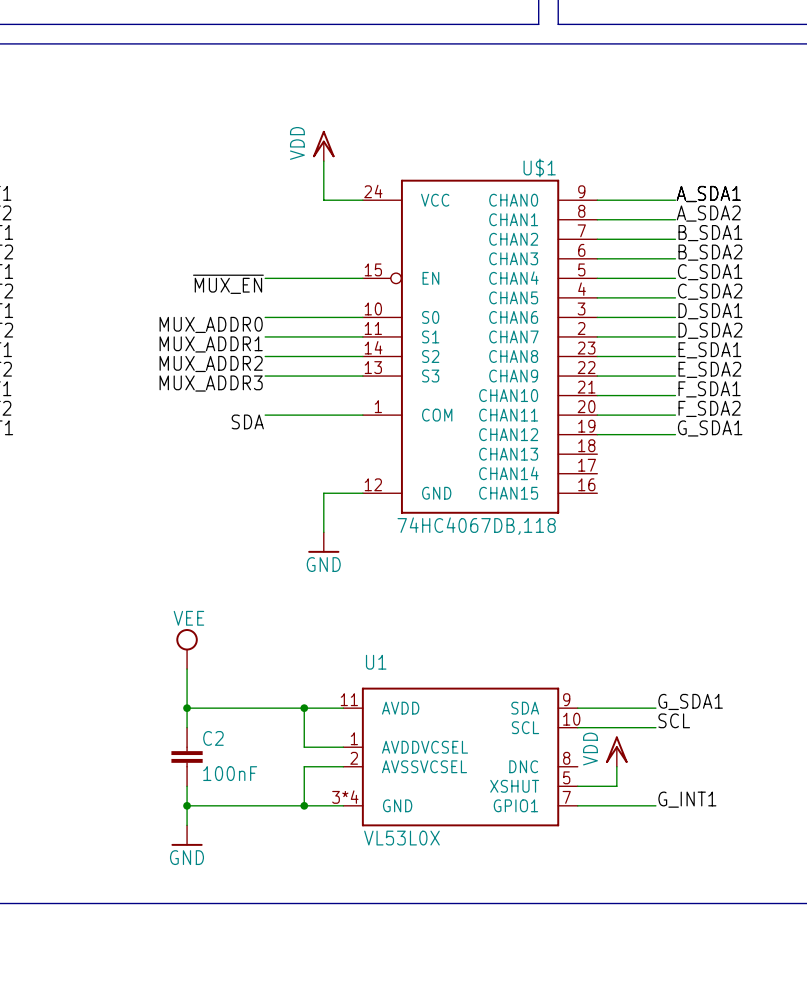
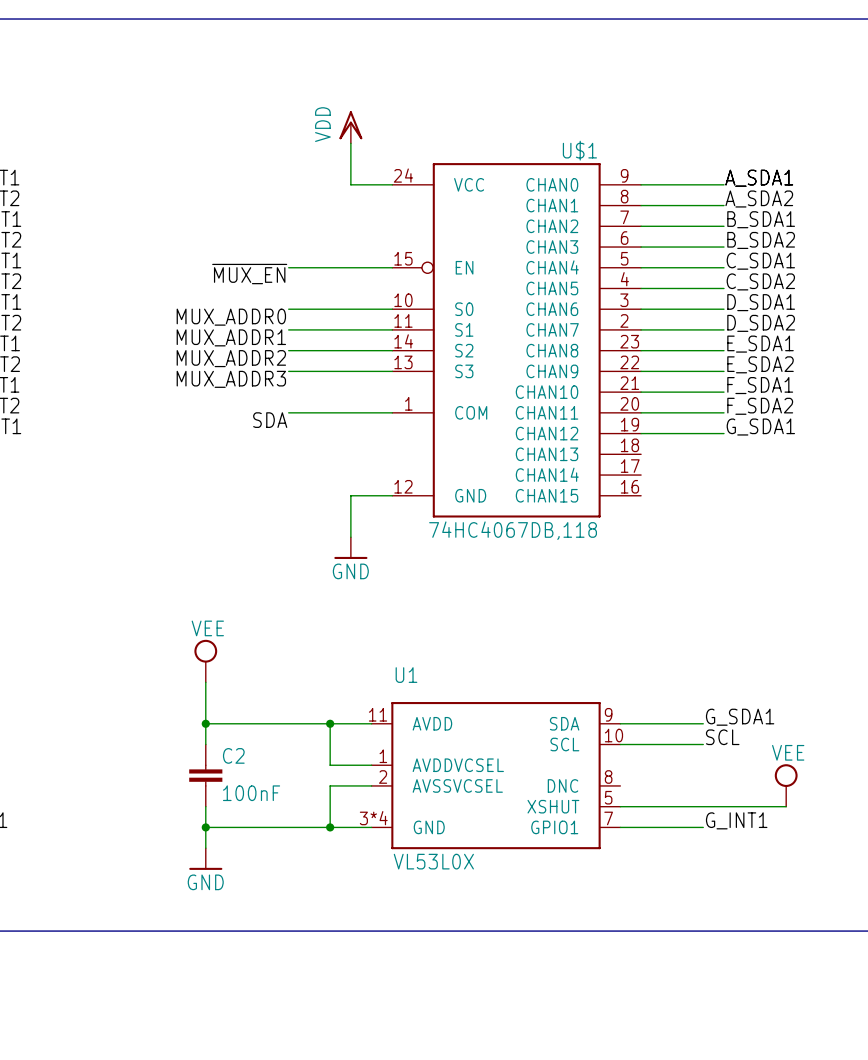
power symbol: VDD (616, 751) -> none
wire: (616, 766) (616, 786) -> (786, 806) (661, 806)
power symbol: none -> VEE (786, 785)

